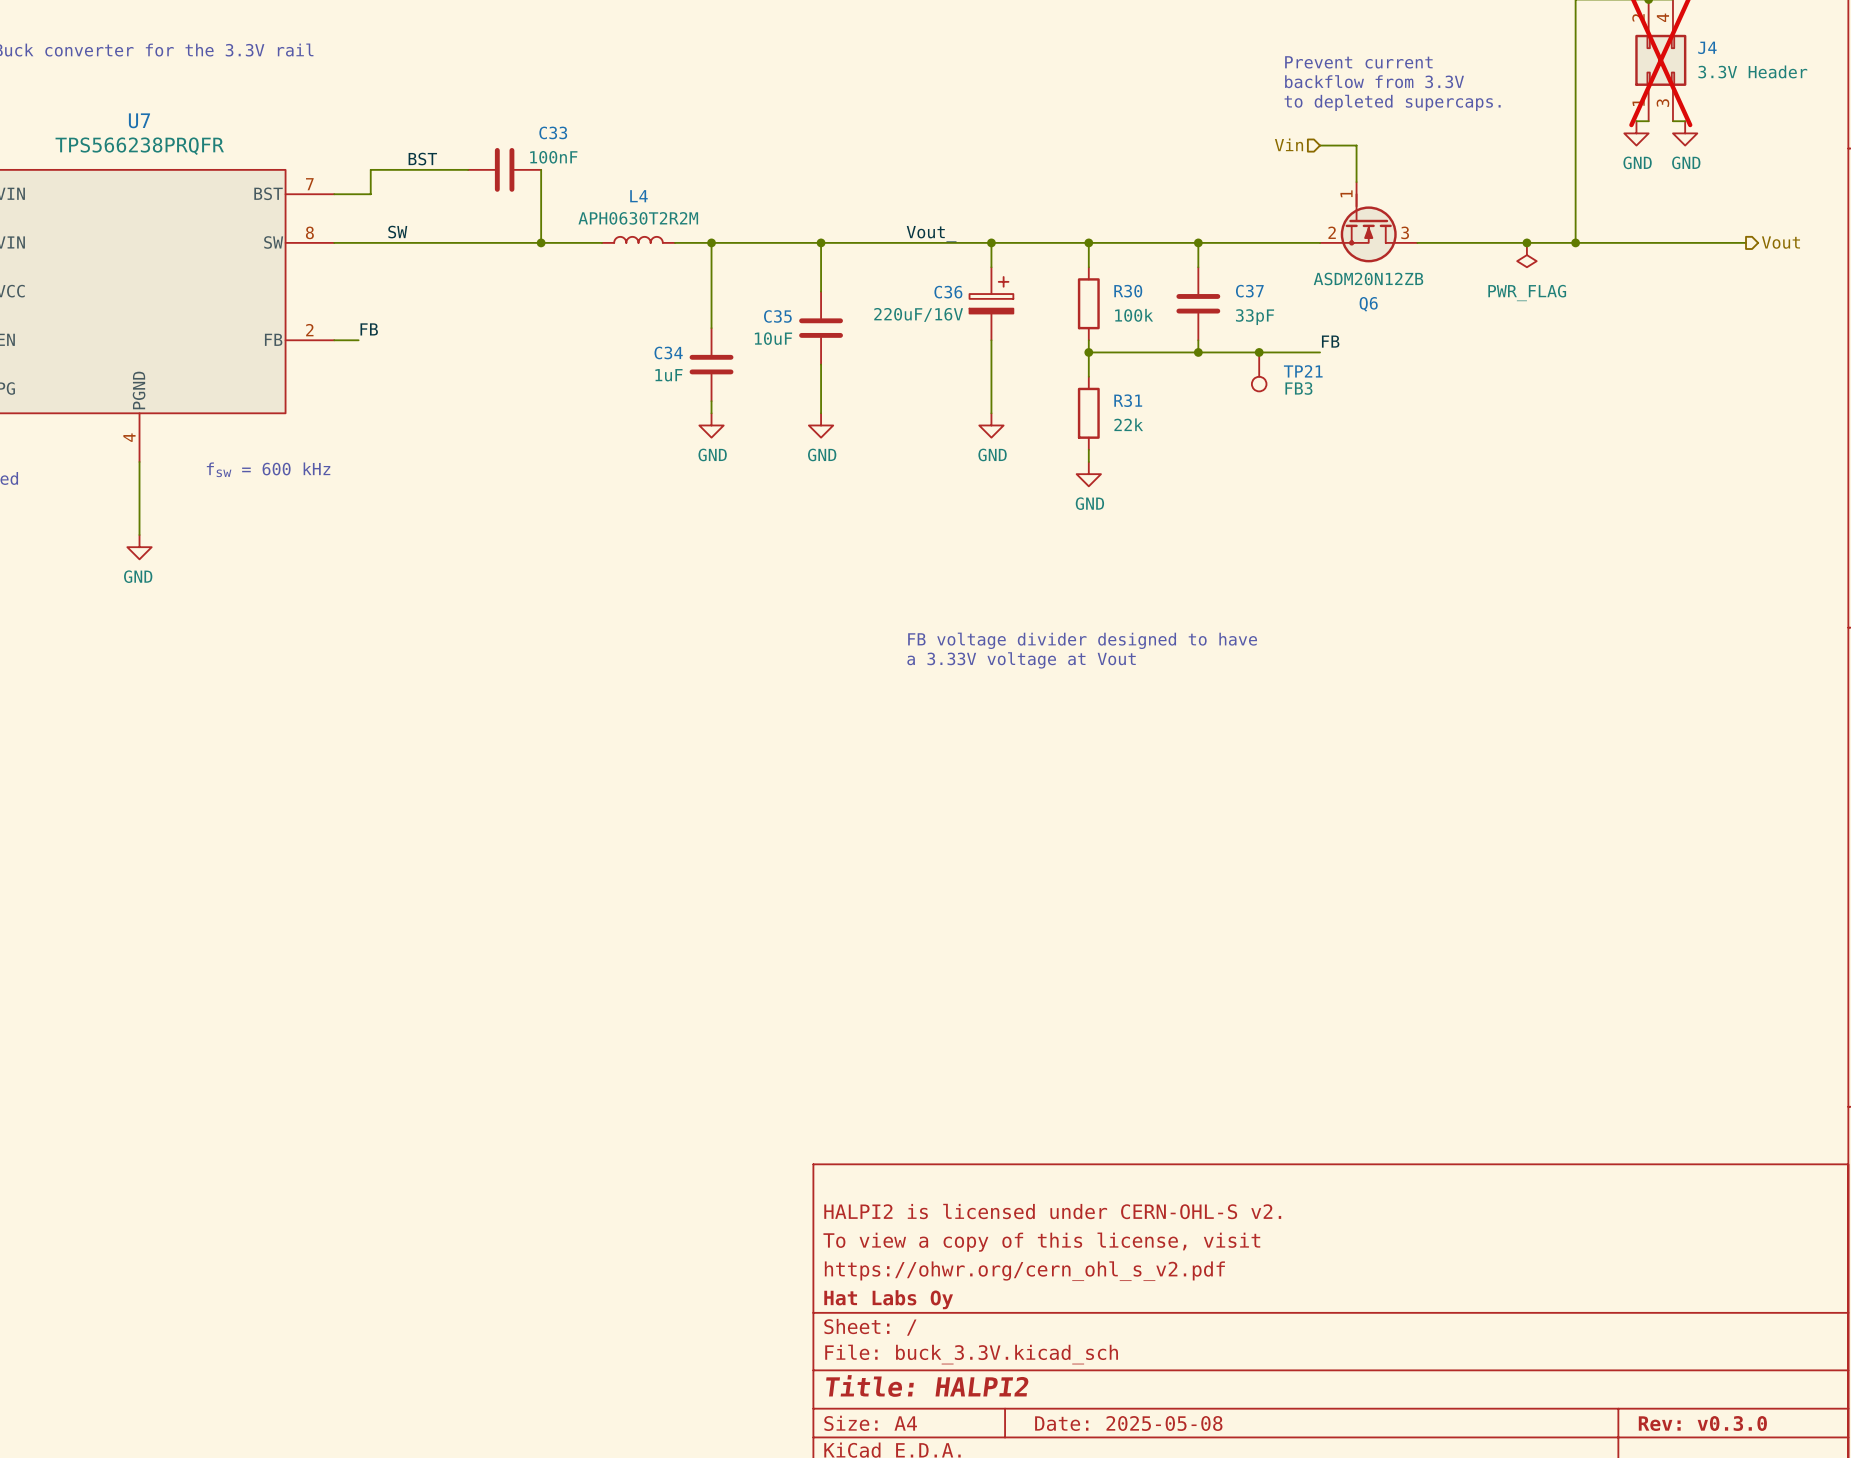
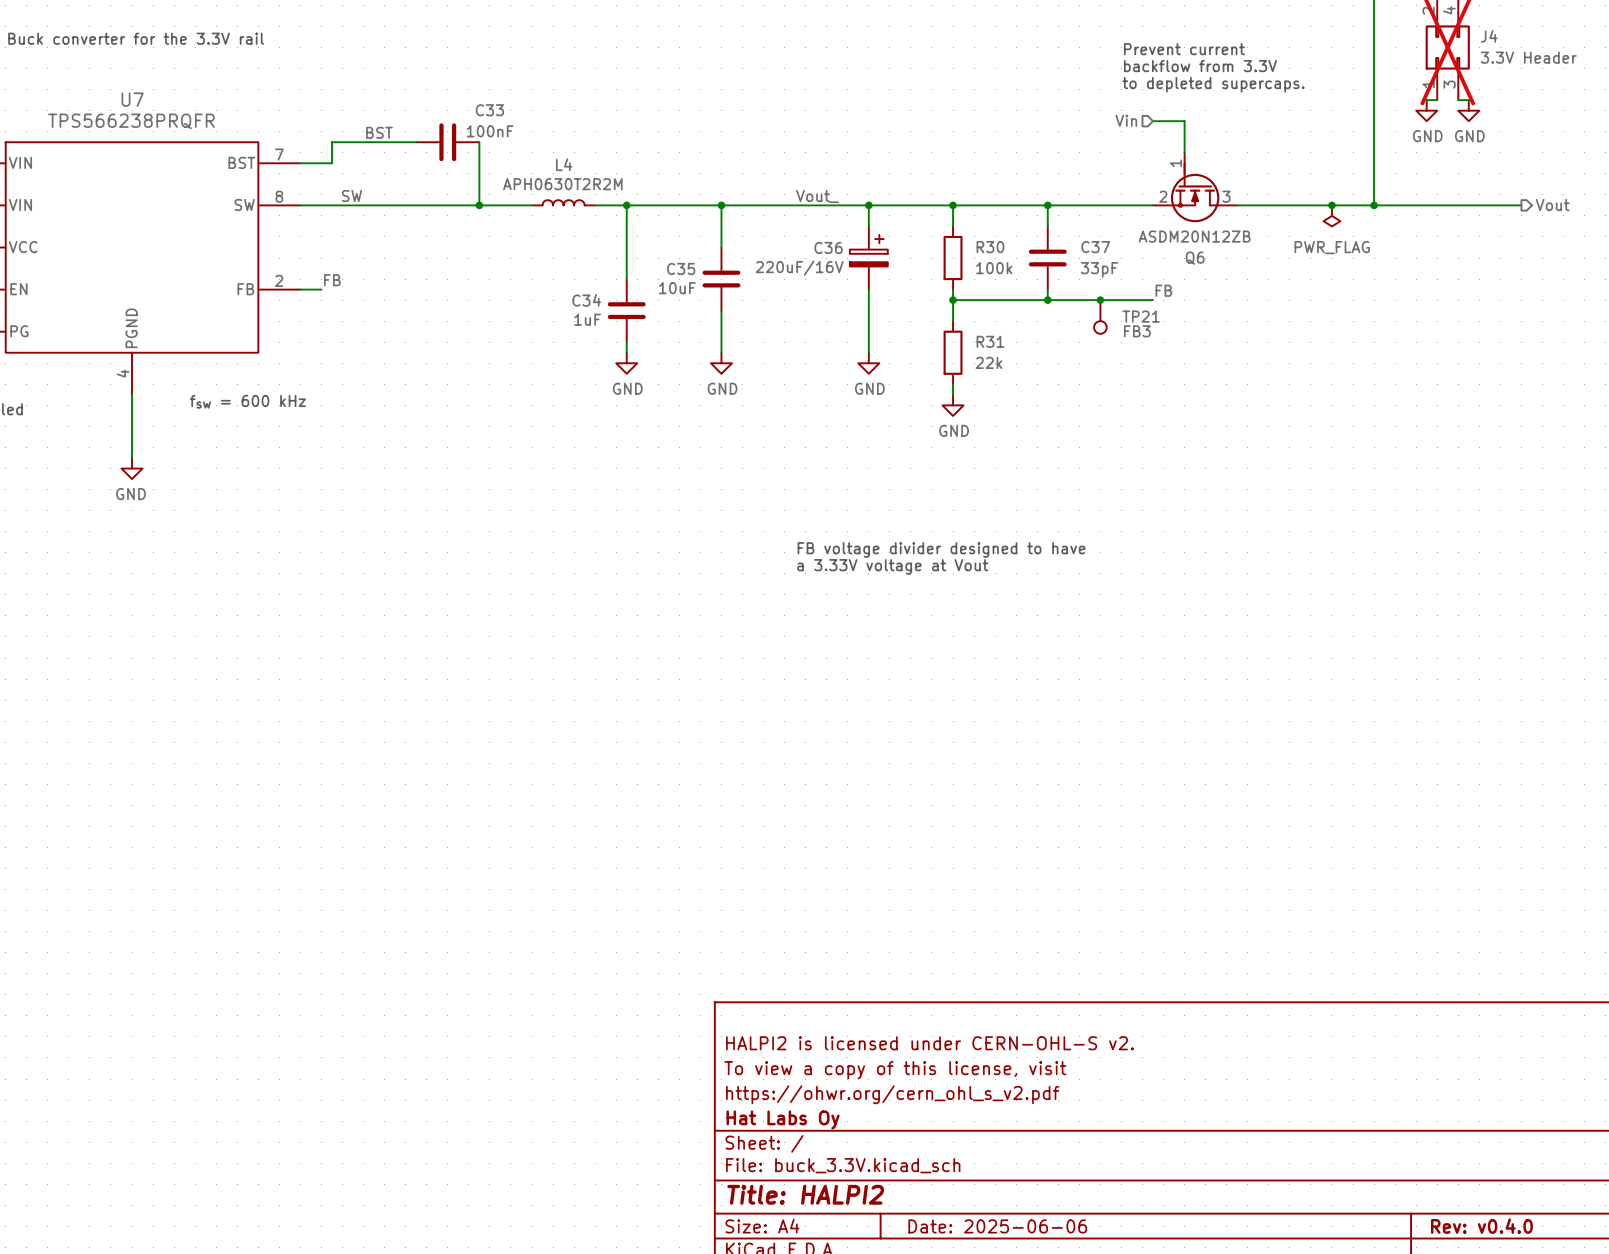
title block: Date: 2025-05-08 (1128, 1423) -> Date: 2025-06-06 (997, 1226)
title block: Rev: v0.3.0 (1702, 1423) -> Rev: v0.4.0 (1481, 1226)

